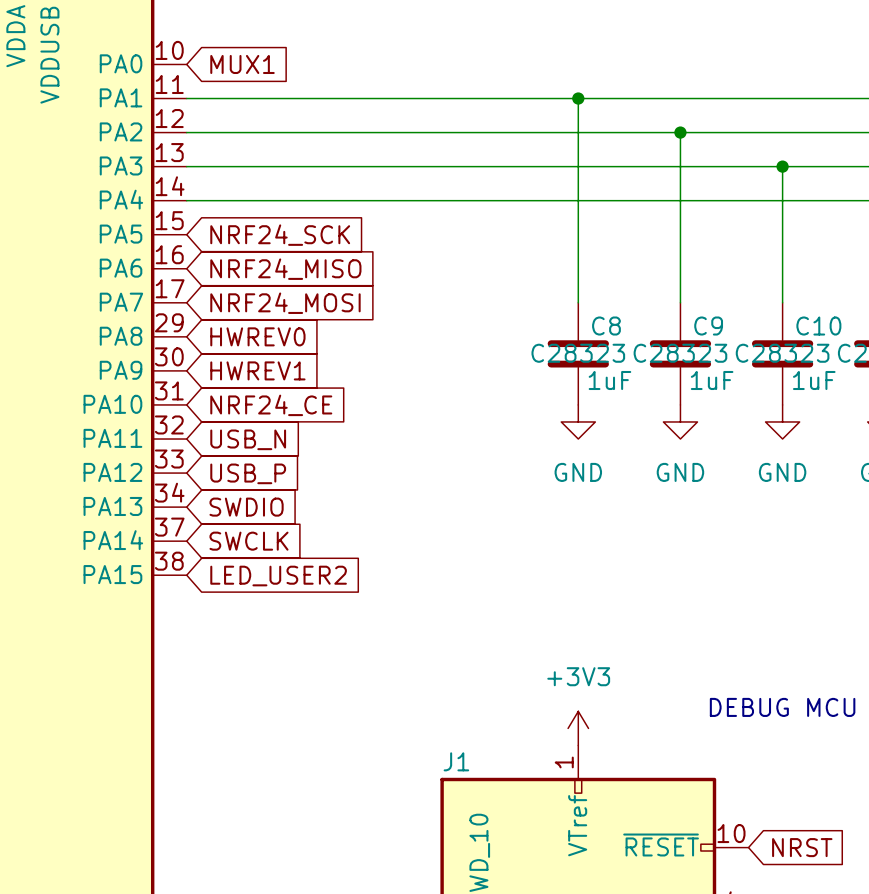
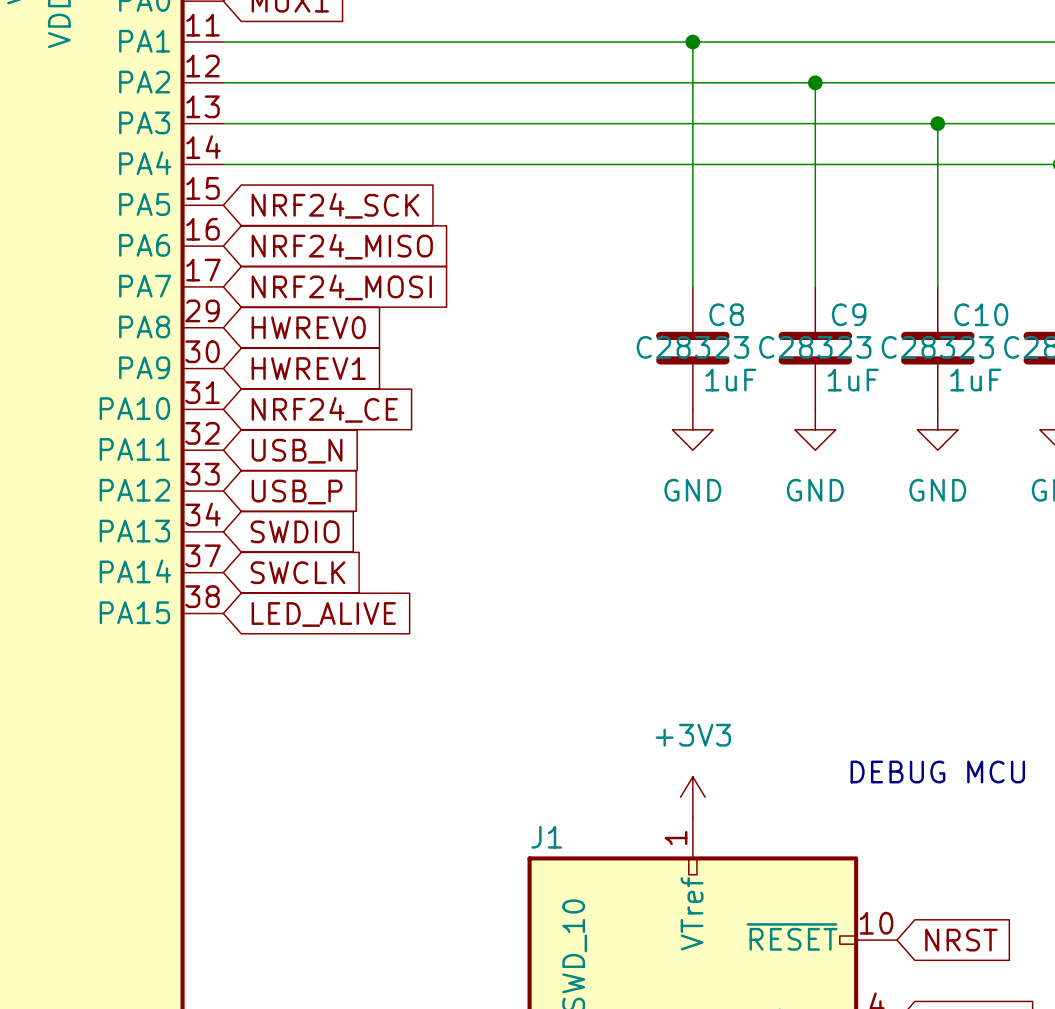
global label: LED_USER2 (278, 576) -> LED_ALIVE (323, 614)

